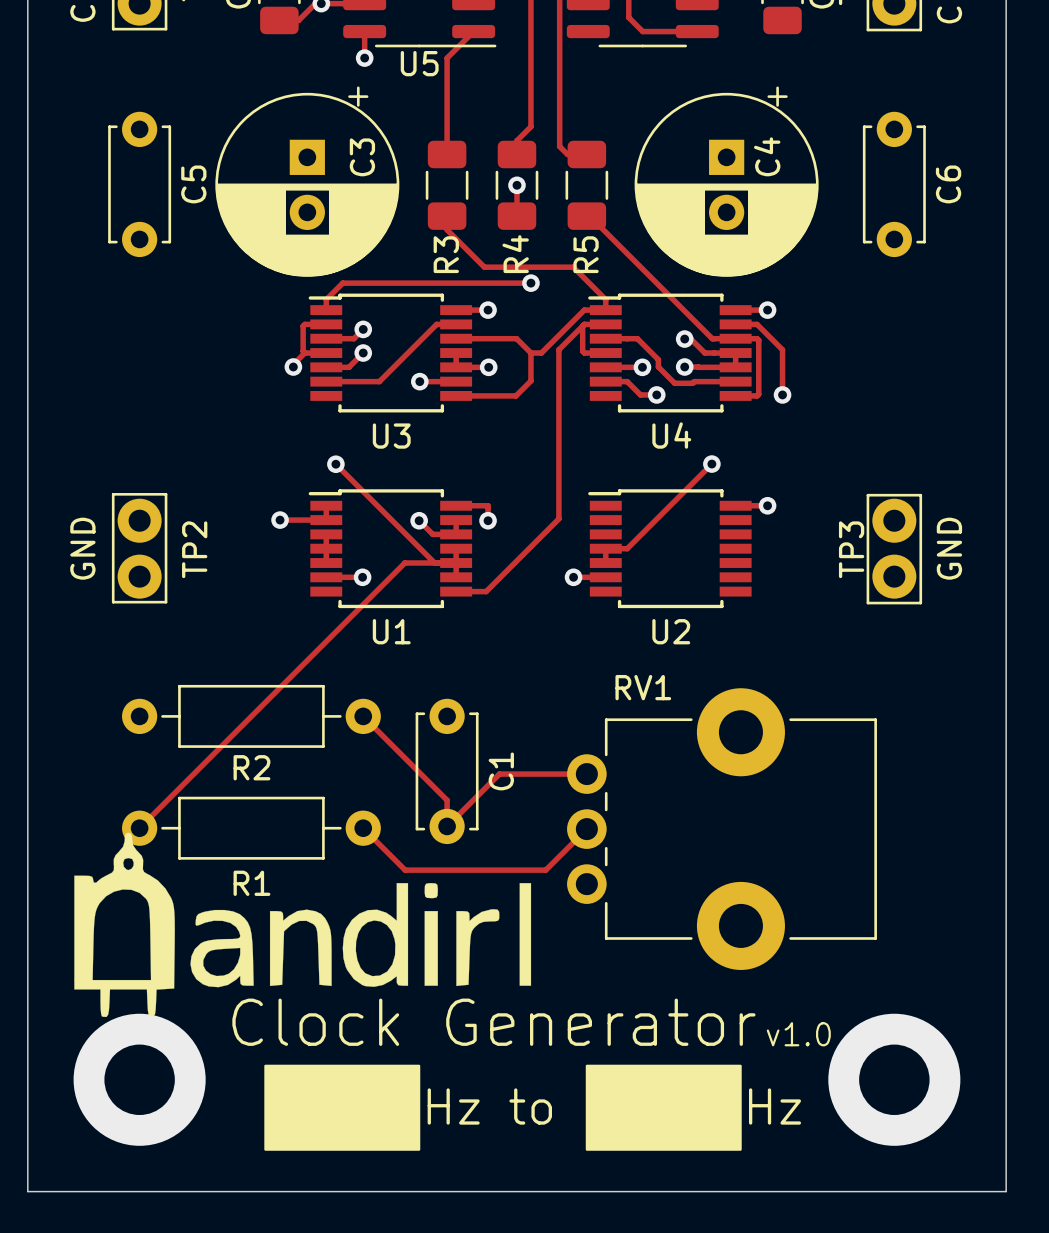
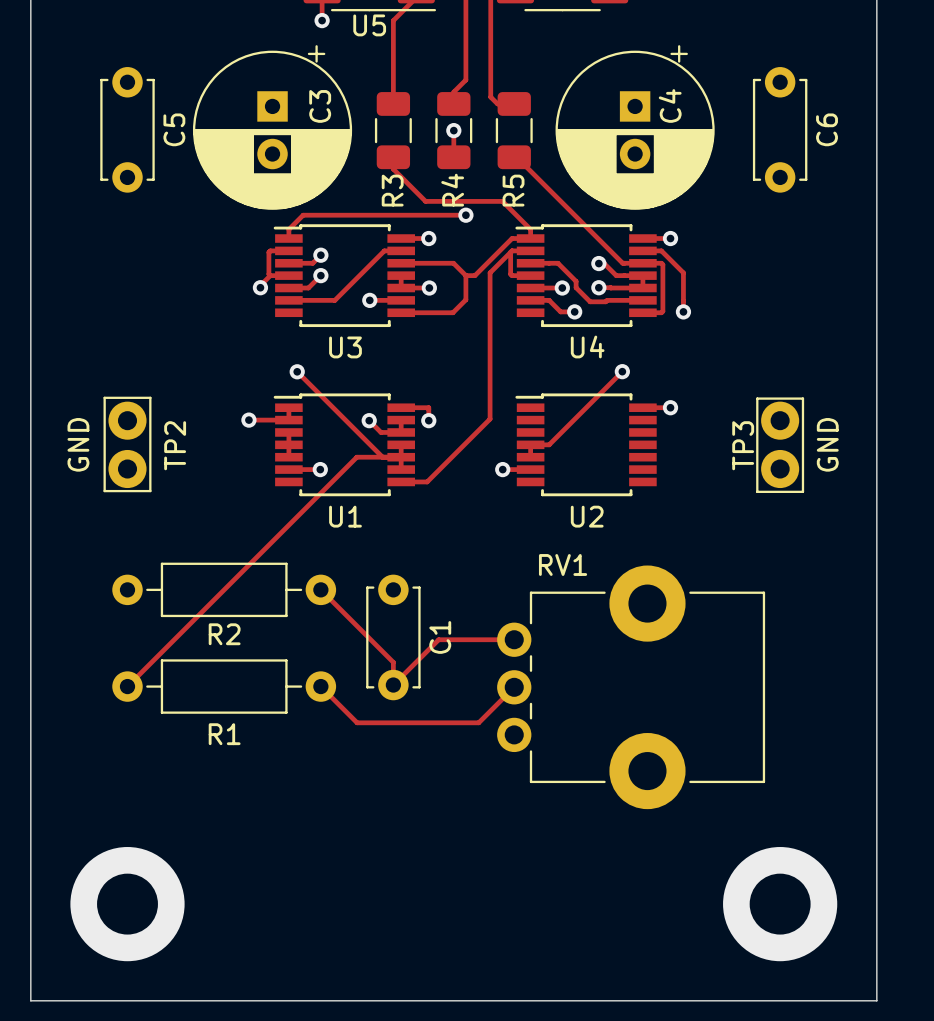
drawing: [74, 832, 532, 1018] -> none
text: Clock Generator (493, 1022) -> none
text: v1.0 (798, 1034) -> none
drawing: [264, 1064, 421, 1151] -> none
drawing: [585, 1064, 742, 1151] -> none
text: Hz to (489, 1106) -> none
text: Hz (775, 1106) -> none

